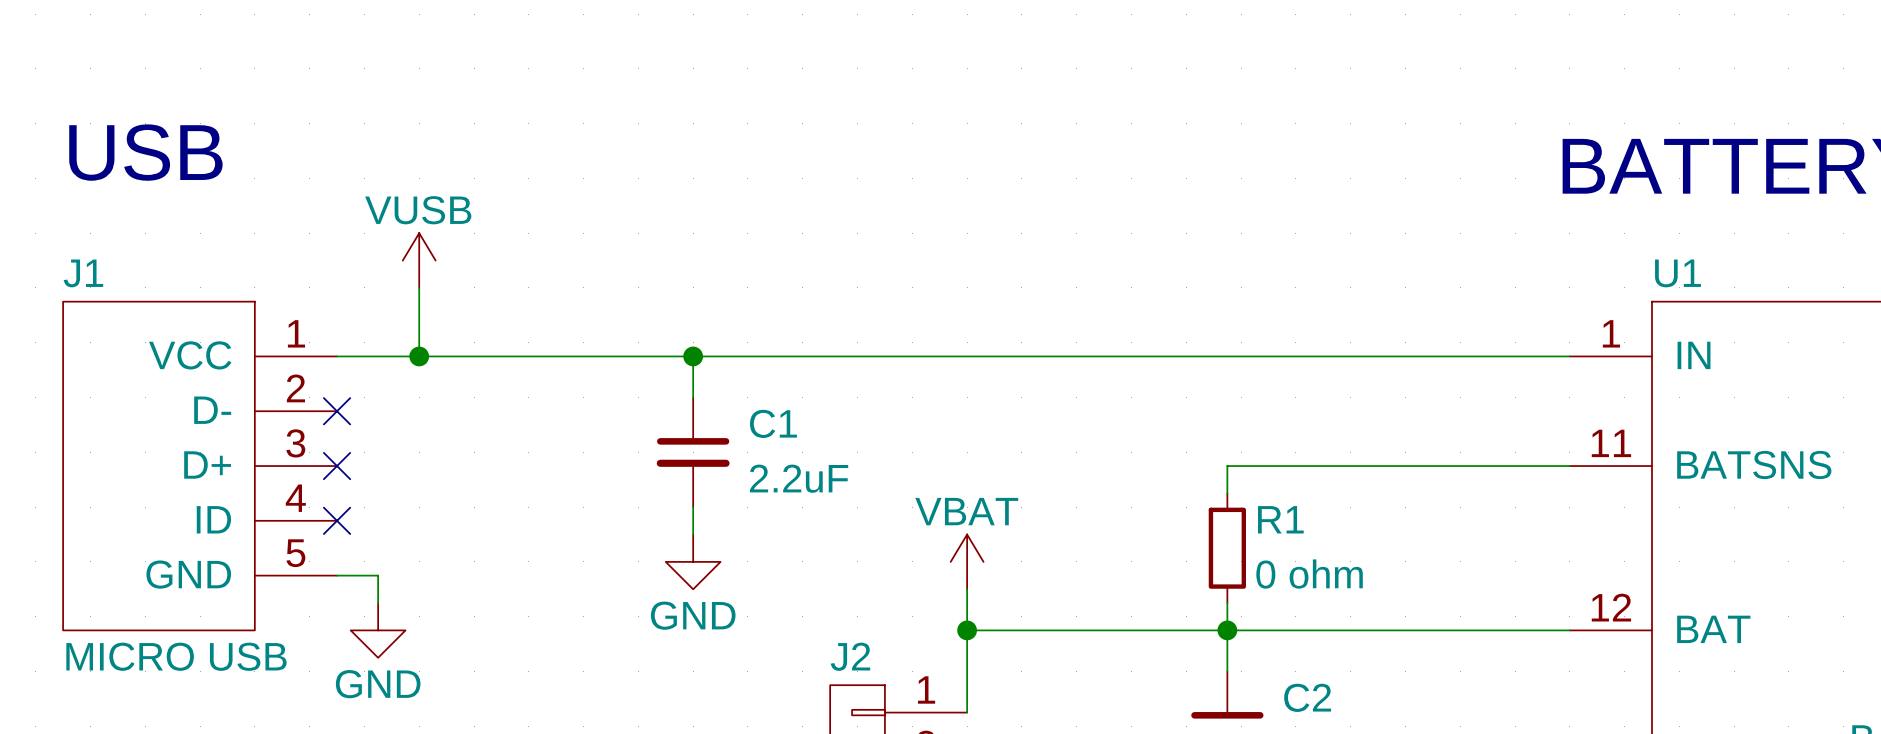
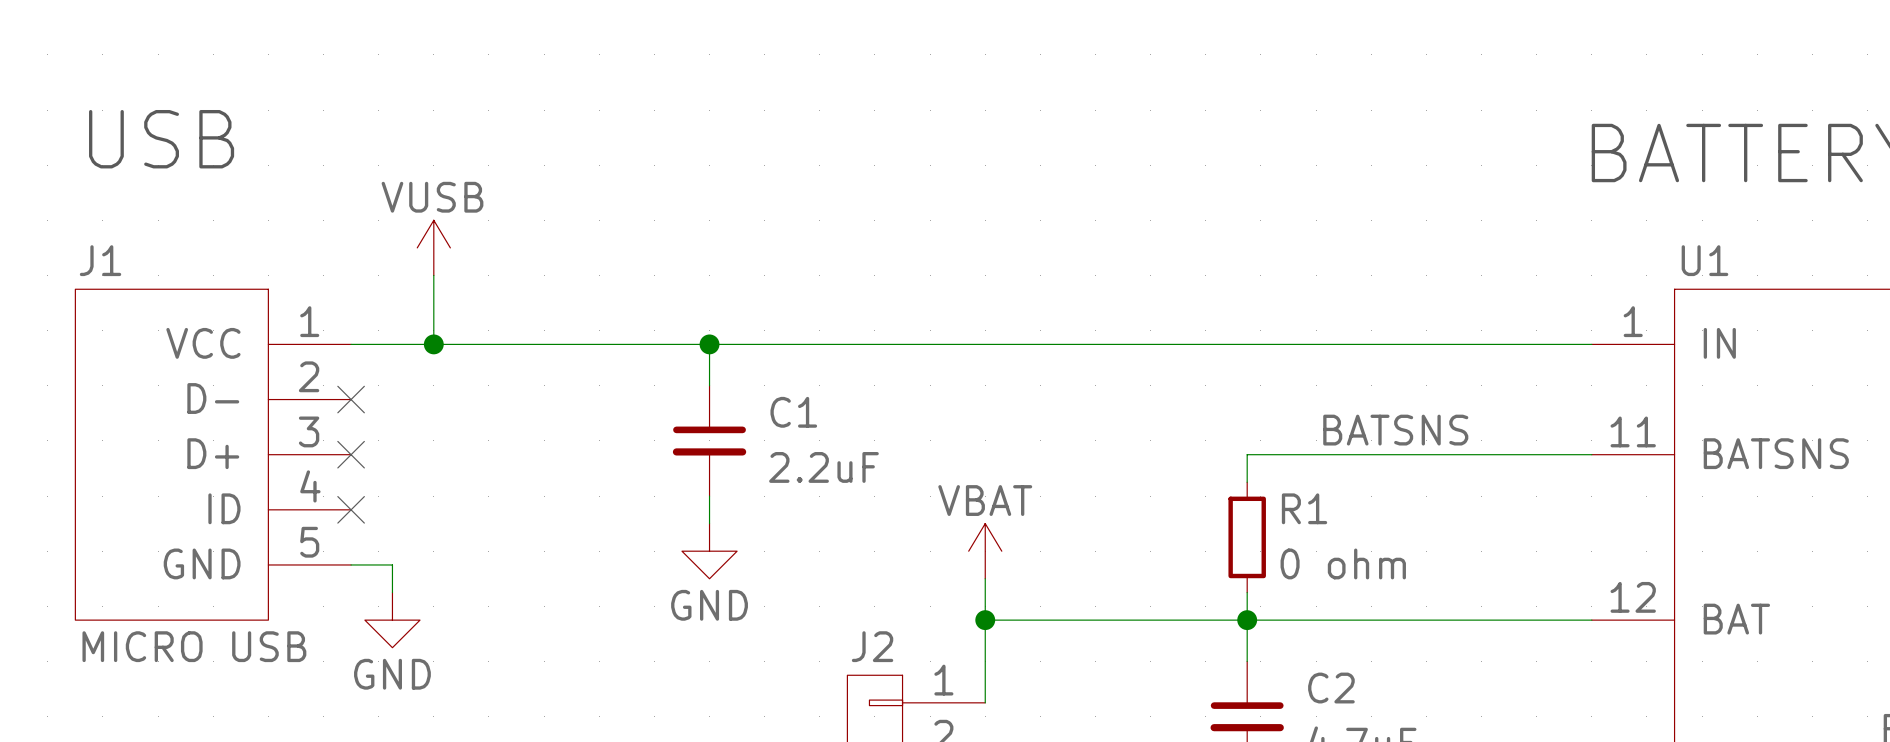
label: none -> BATSNS (1395, 430)

